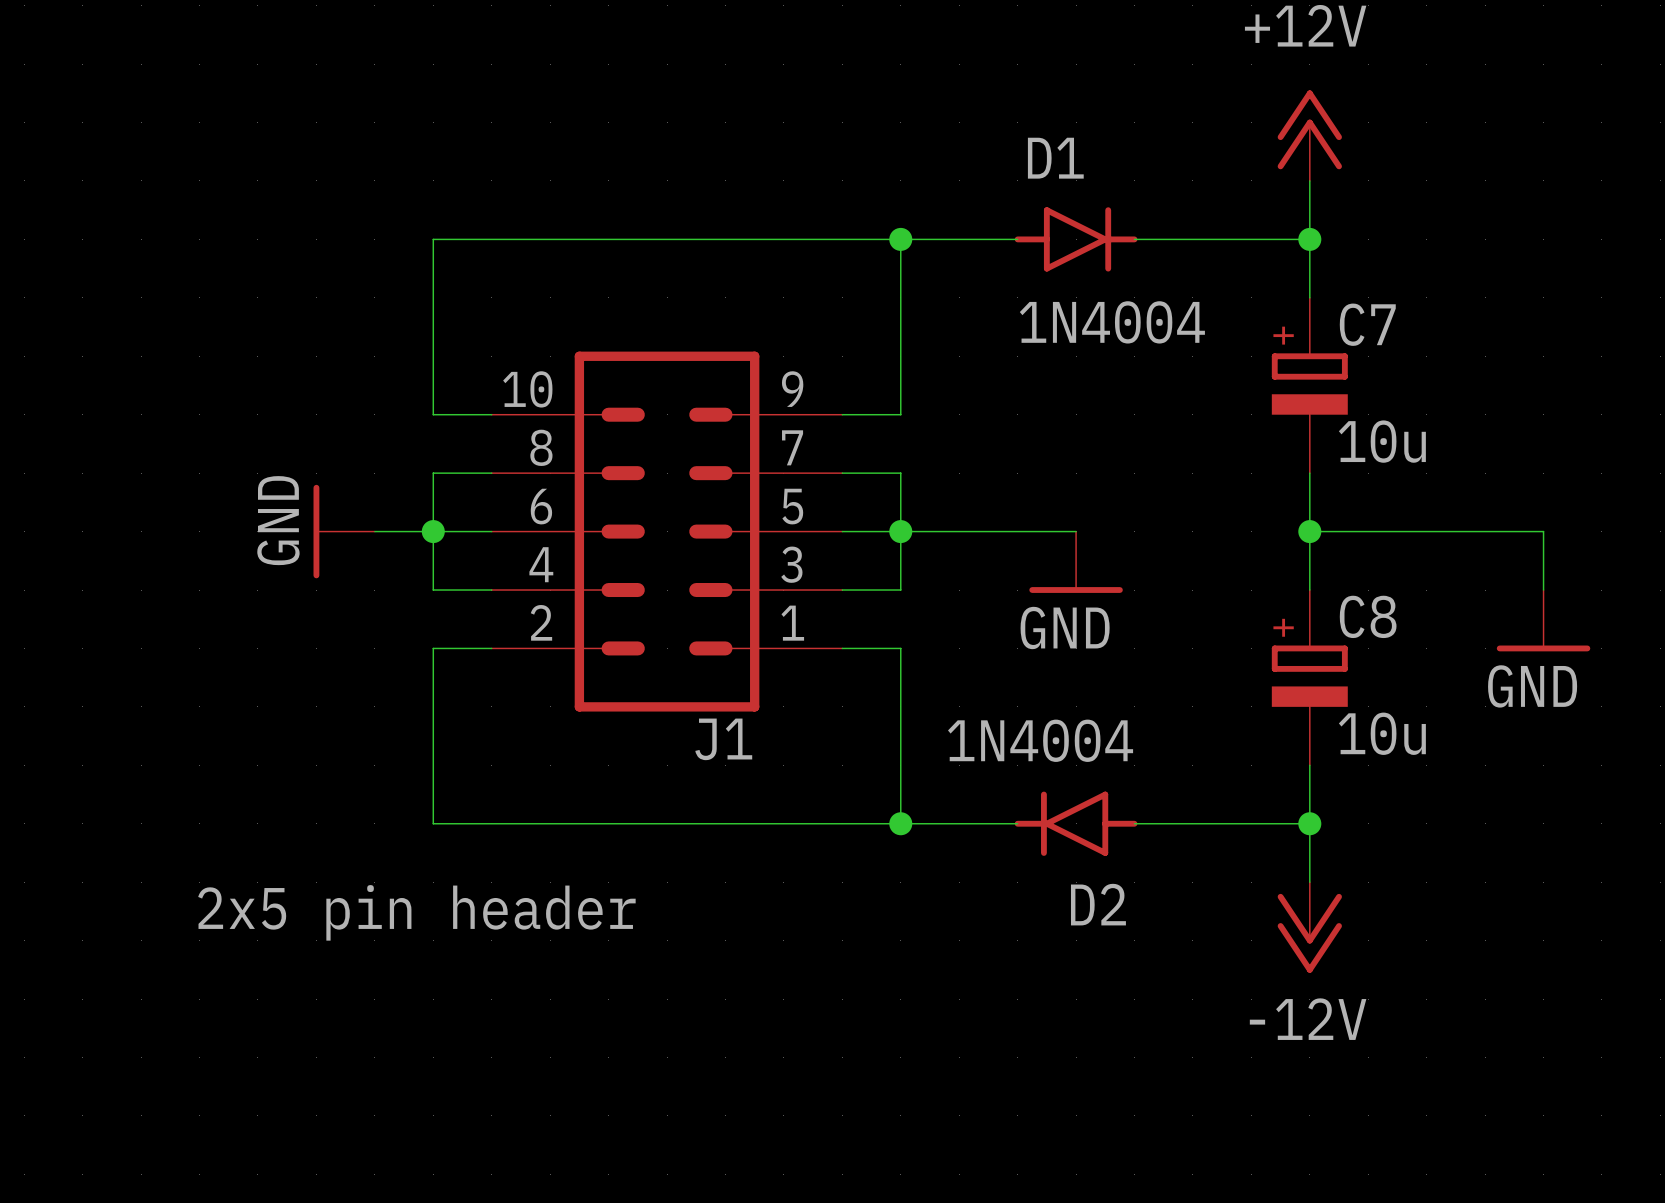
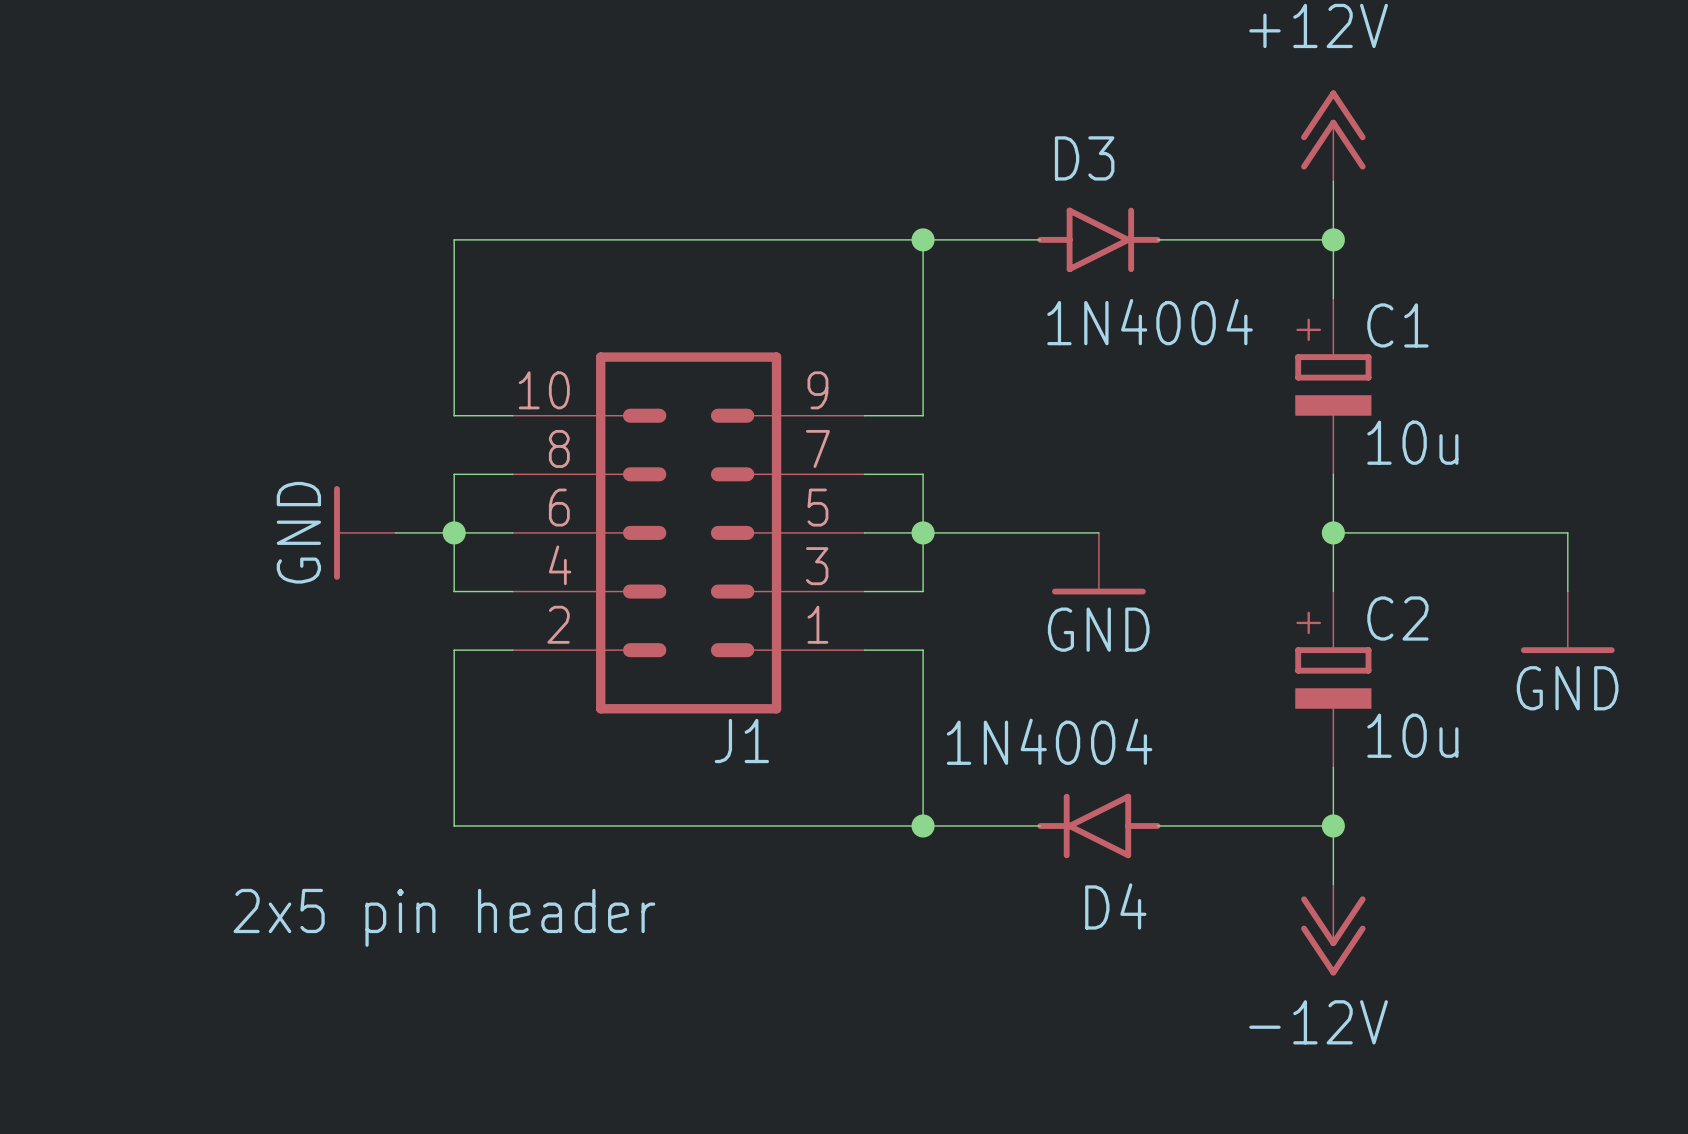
D1 name: D1 (1055, 158) -> D3 (1084, 158)
C7 name: C7 (1367, 324) -> C1 (1397, 325)
C8 name: C8 (1368, 616) -> C2 (1397, 618)
D2 name: D2 (1098, 904) -> D4 (1115, 906)

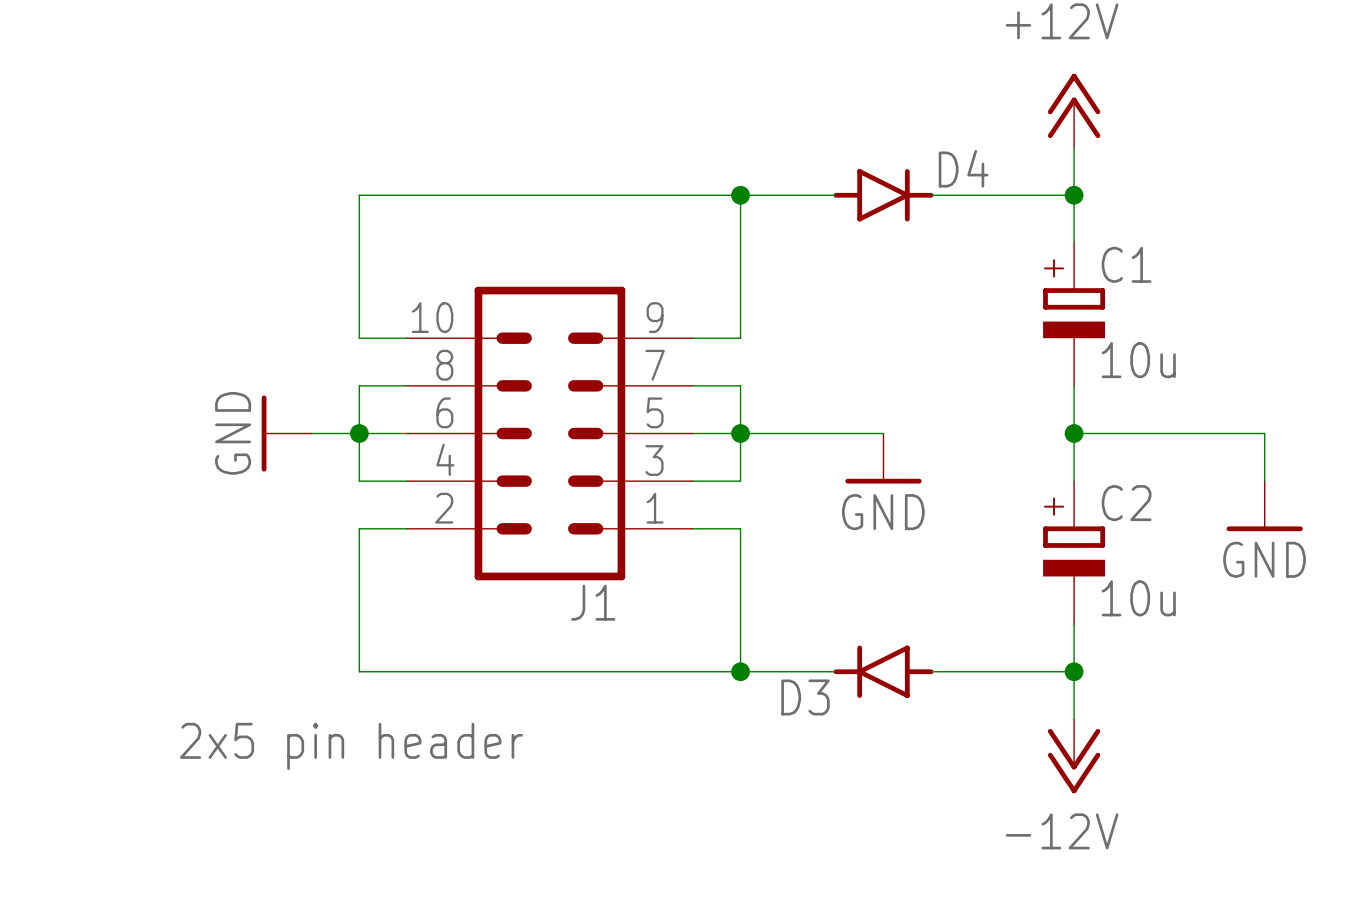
D3 name position: D3 (1084, 158) -> D3 (805, 697)
D3 symbol: [1037, 207, 1161, 273] -> [833, 645, 934, 698]
D3 value: 1N4004 (1150, 322) -> none
D4 value: 1N4004 (1049, 741) -> none
D4 symbol: [1037, 793, 1161, 859] -> [833, 169, 934, 222]
D4 name position: D4 (1115, 906) -> D4 (963, 168)

